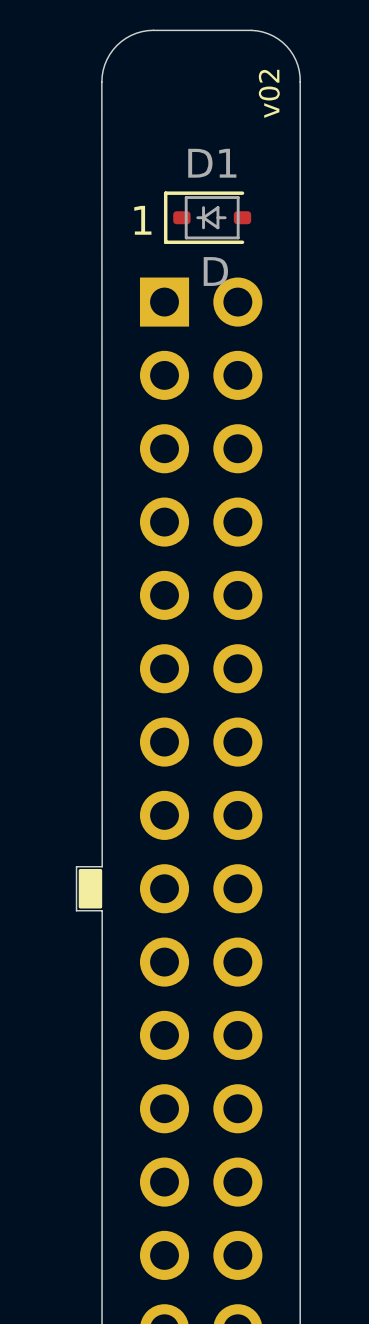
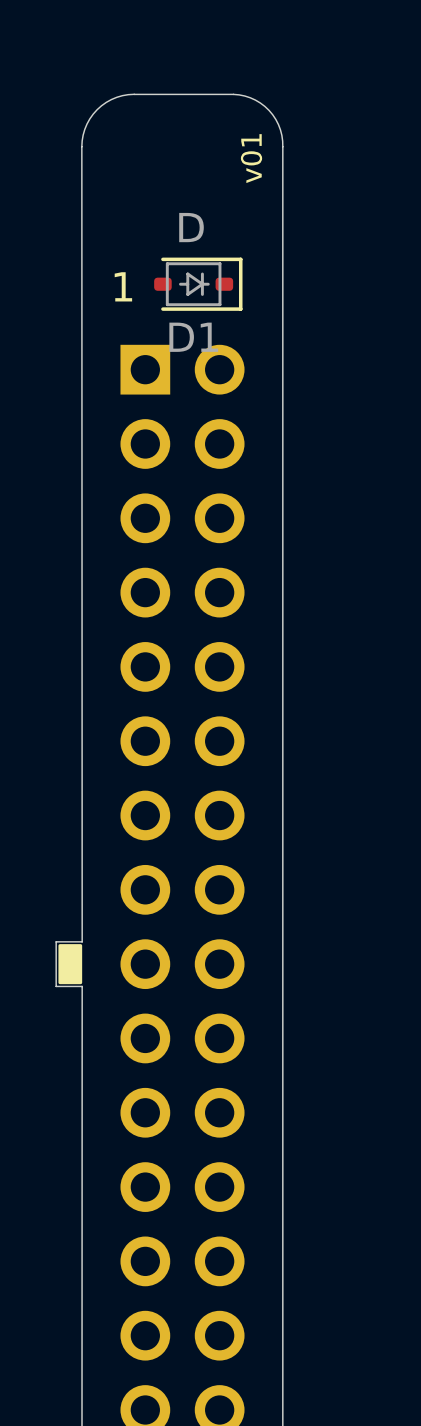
text: v02 (269, 93) -> v01 (251, 158)
D1 rotation: 0° (207, 217) -> 180° (198, 284)

